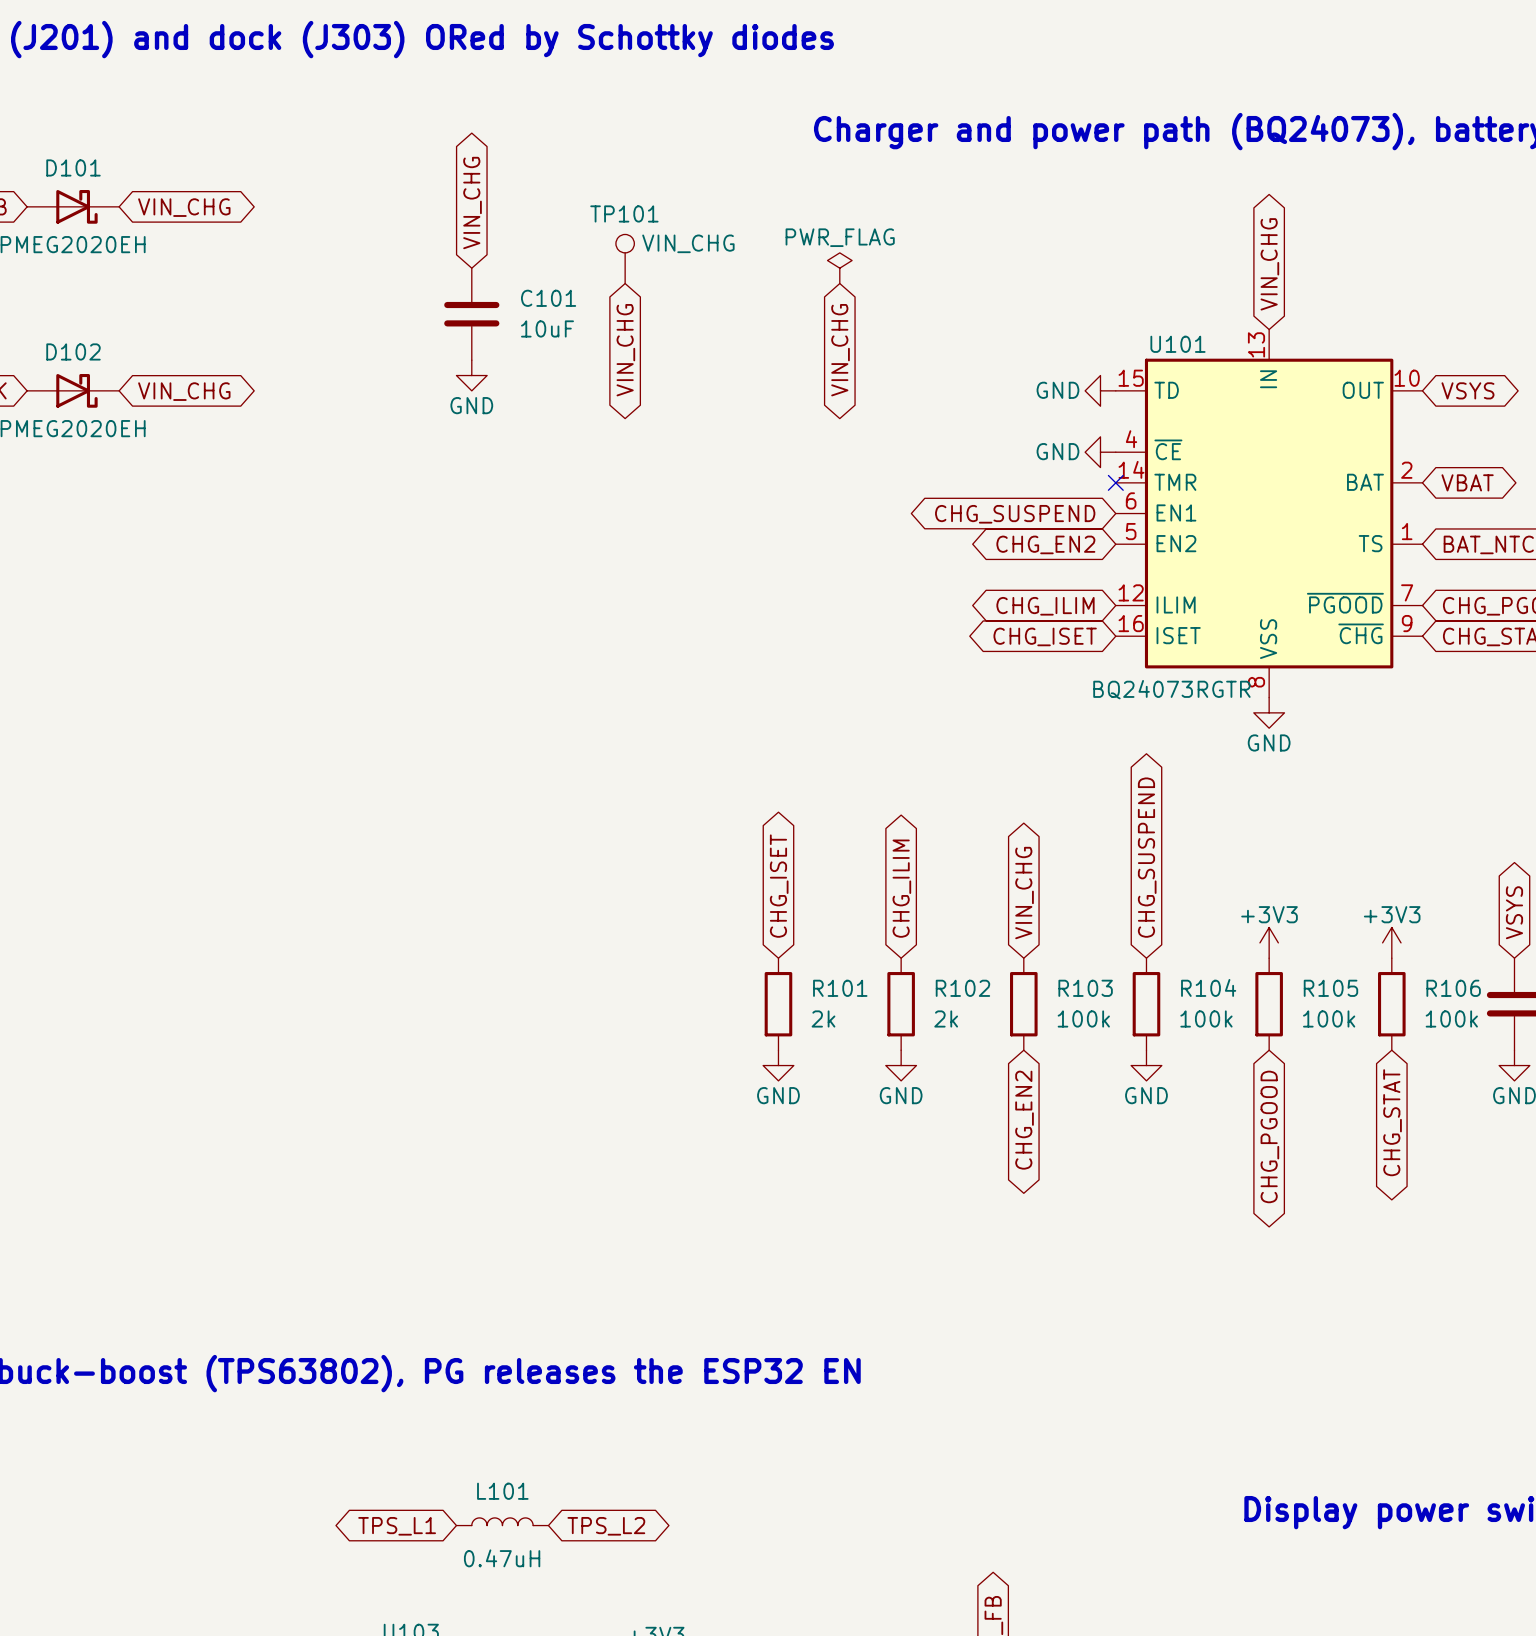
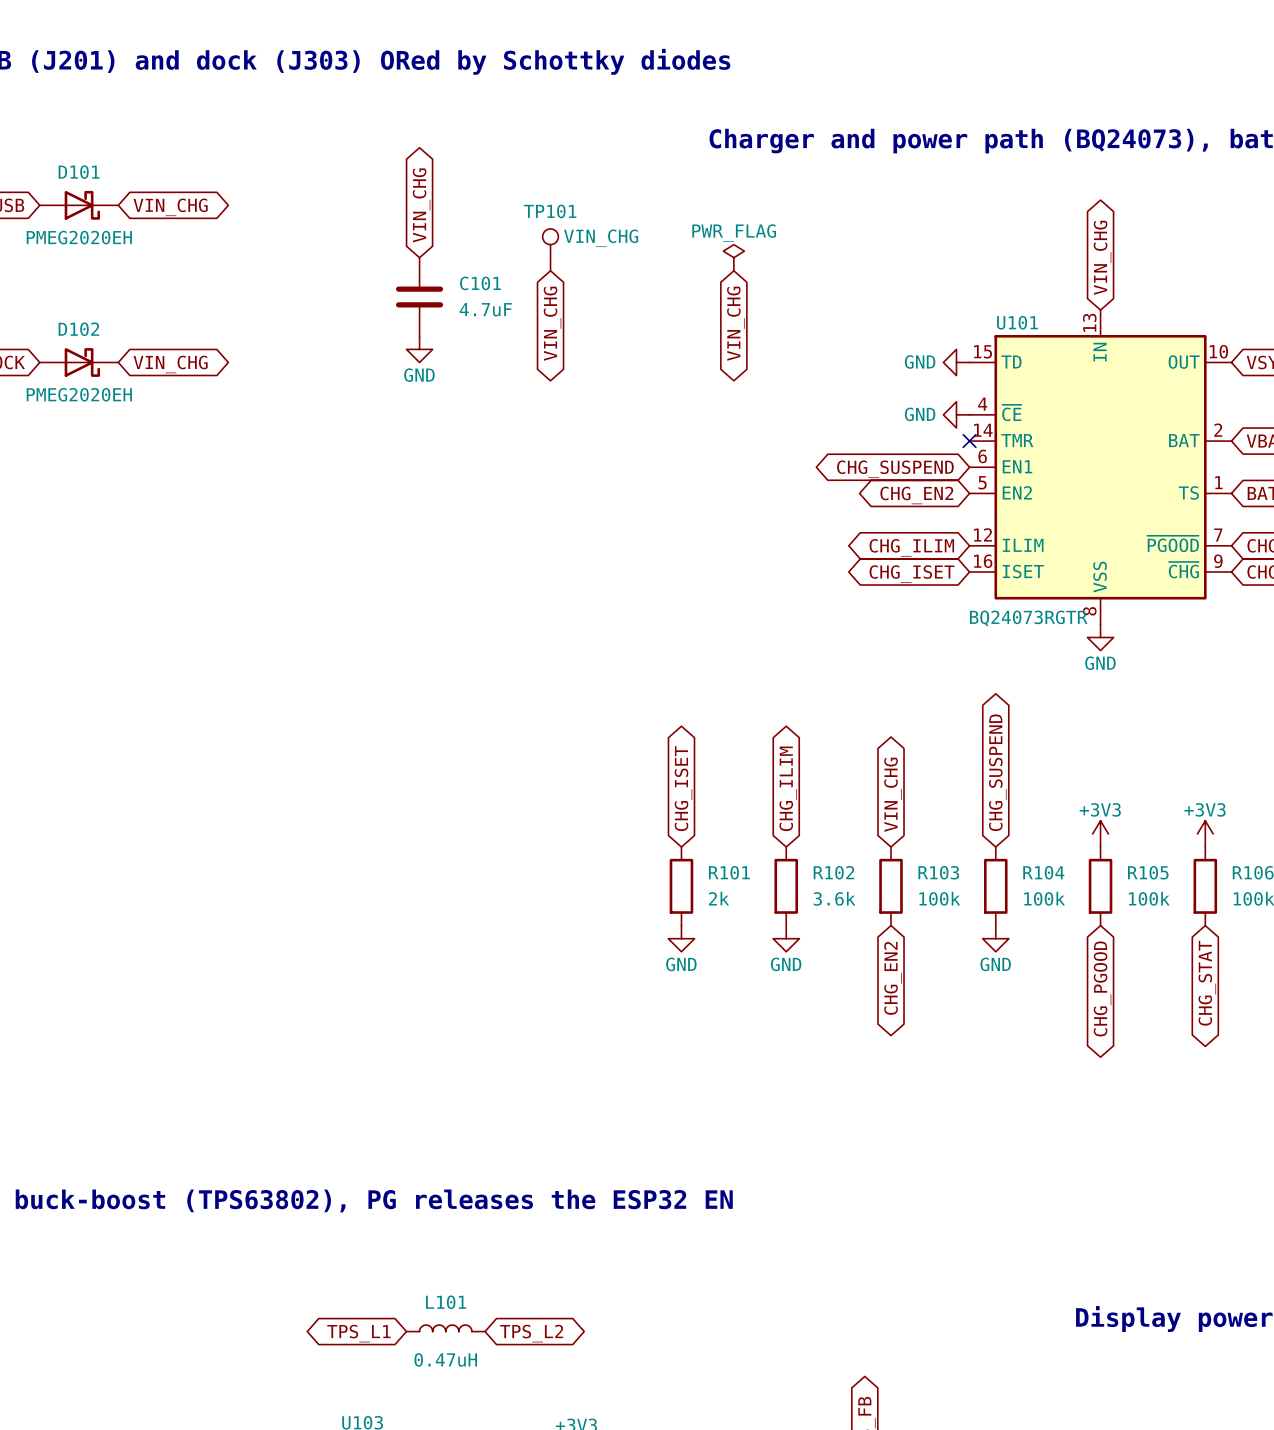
C101 value: 10uF (547, 328) -> 4.7uF (485, 309)
R102 value: 2k (946, 1018) -> 3.6k (834, 898)

